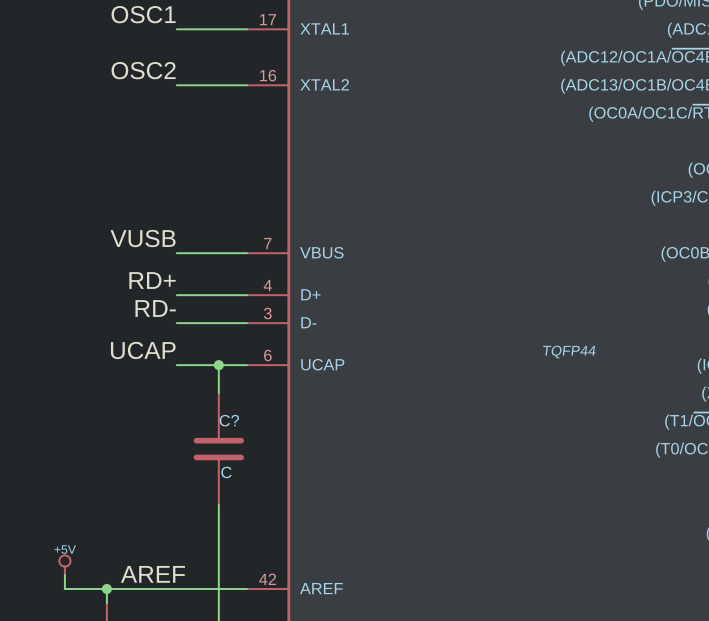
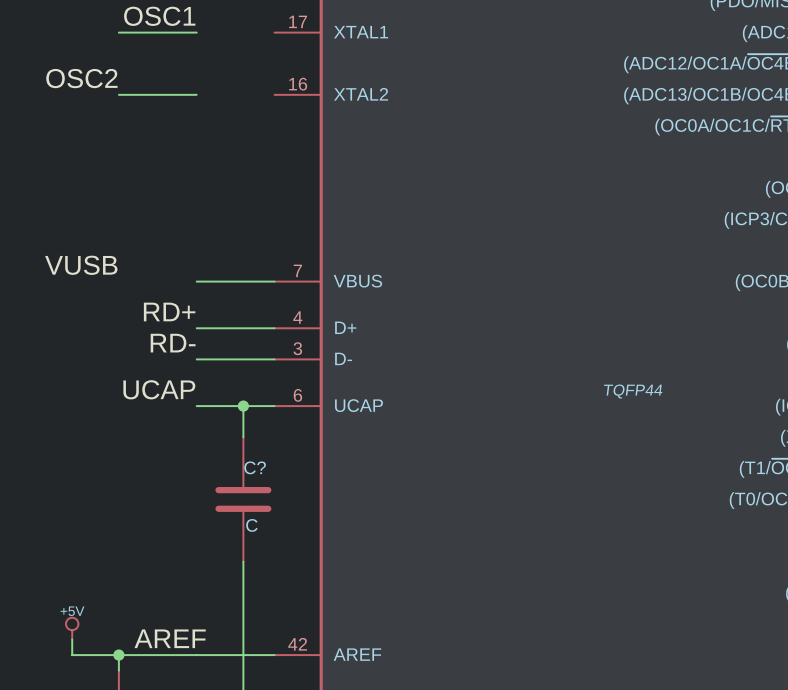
wire: (176, 29) (246, 29) -> (196, 32) (118, 32)
label position: OSC2 (143, 70) -> OSC2 (81, 78)
wire: (176, 85) (246, 85) -> (196, 94) (118, 94)
label position: VUSB (143, 238) -> VUSB (81, 265)

